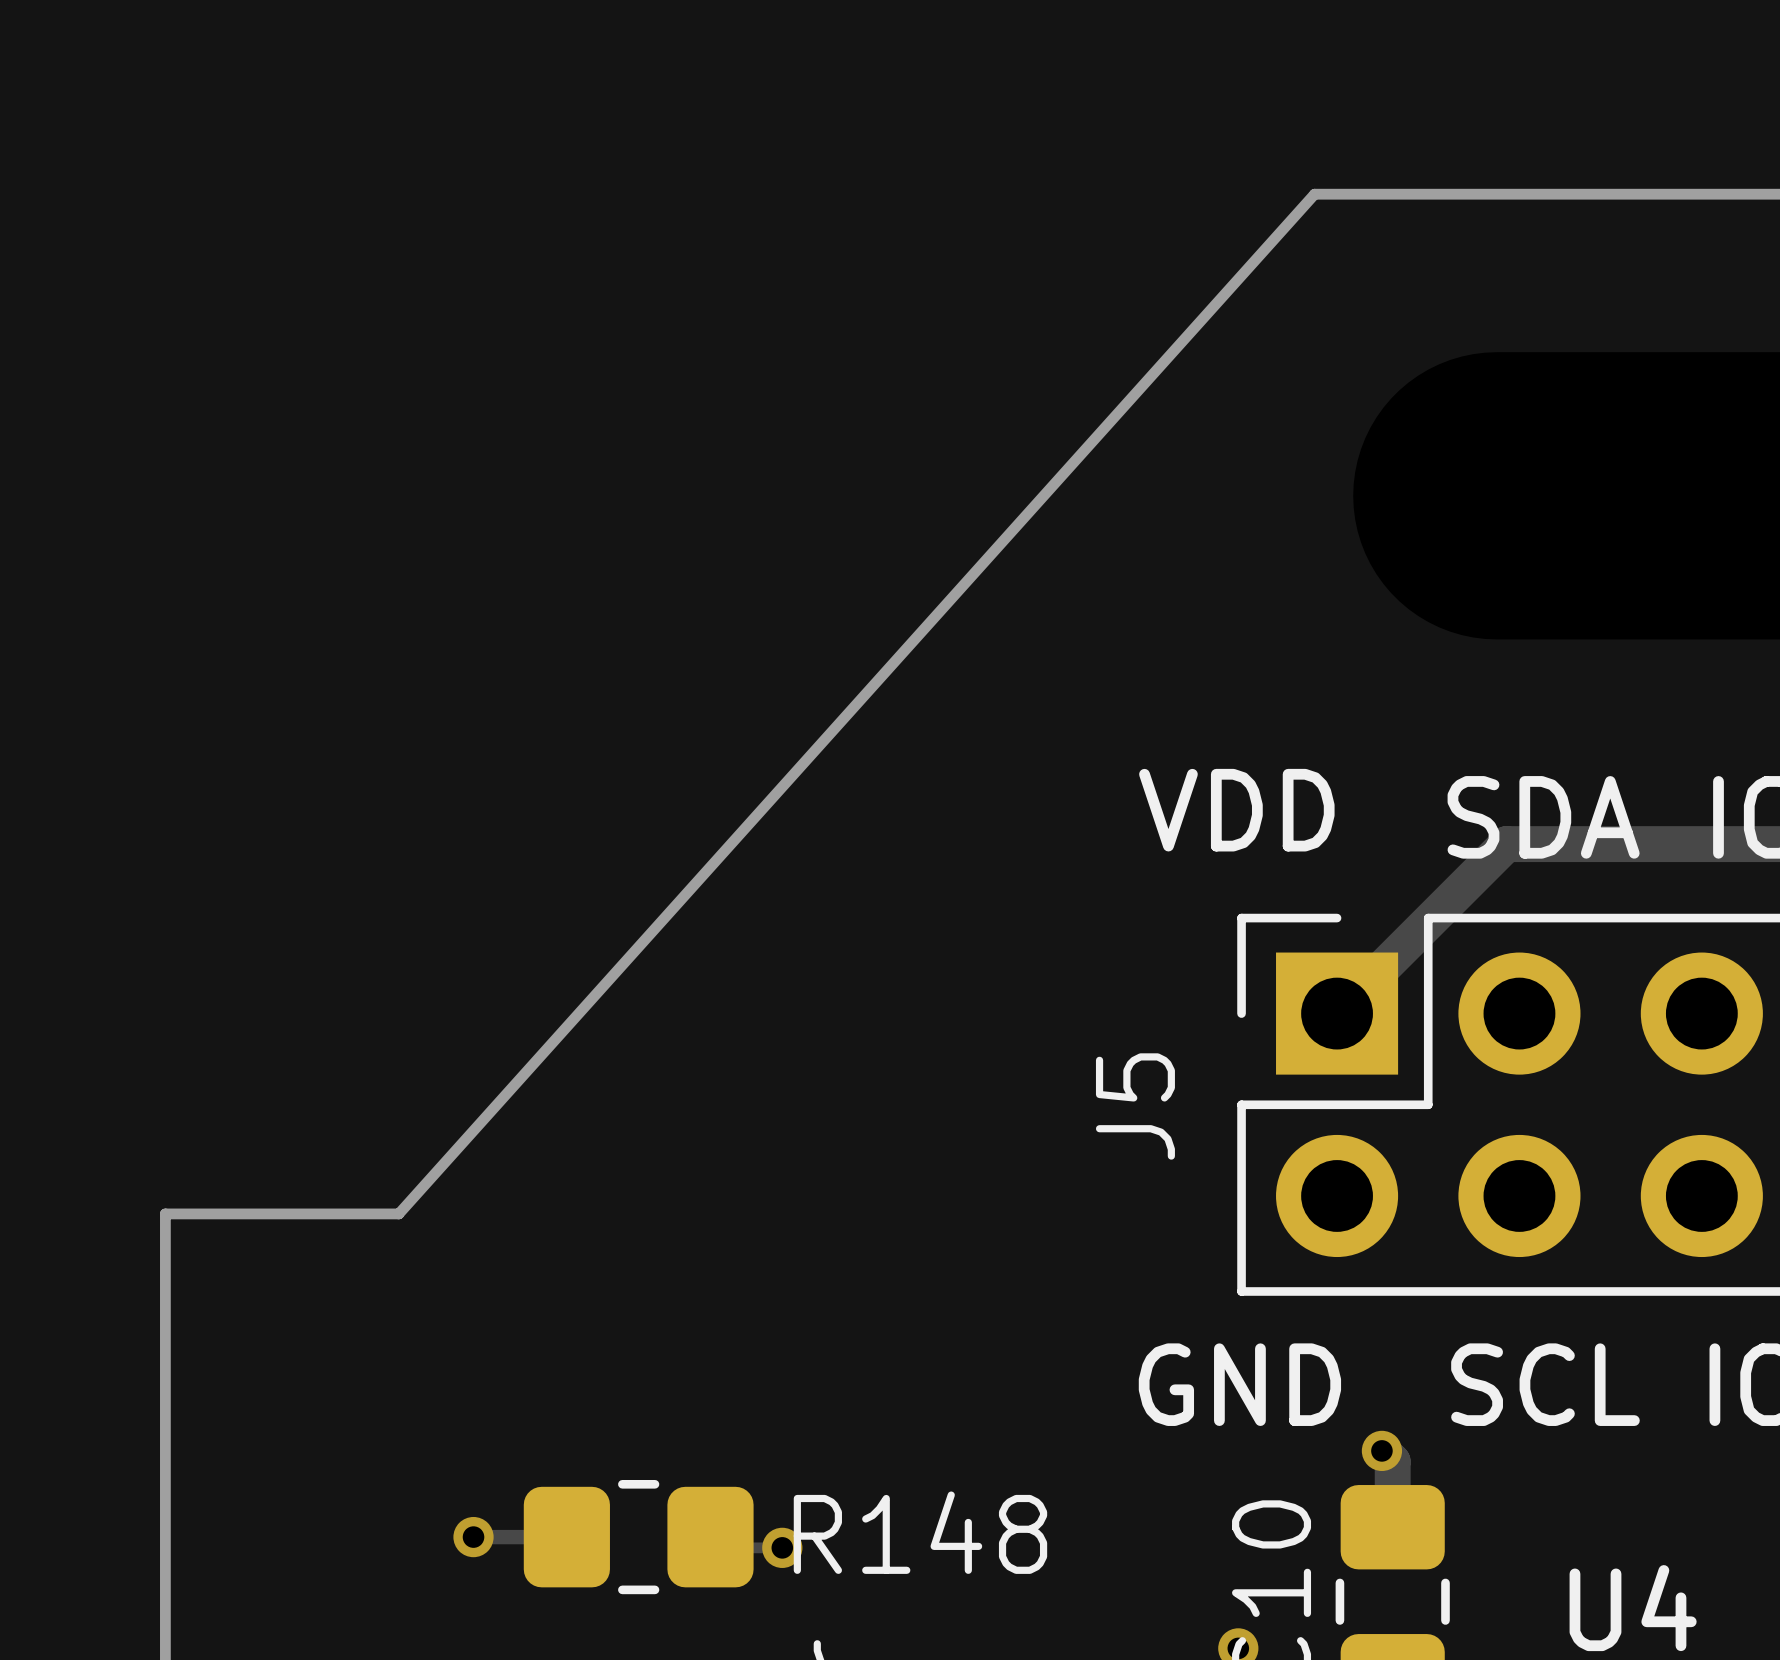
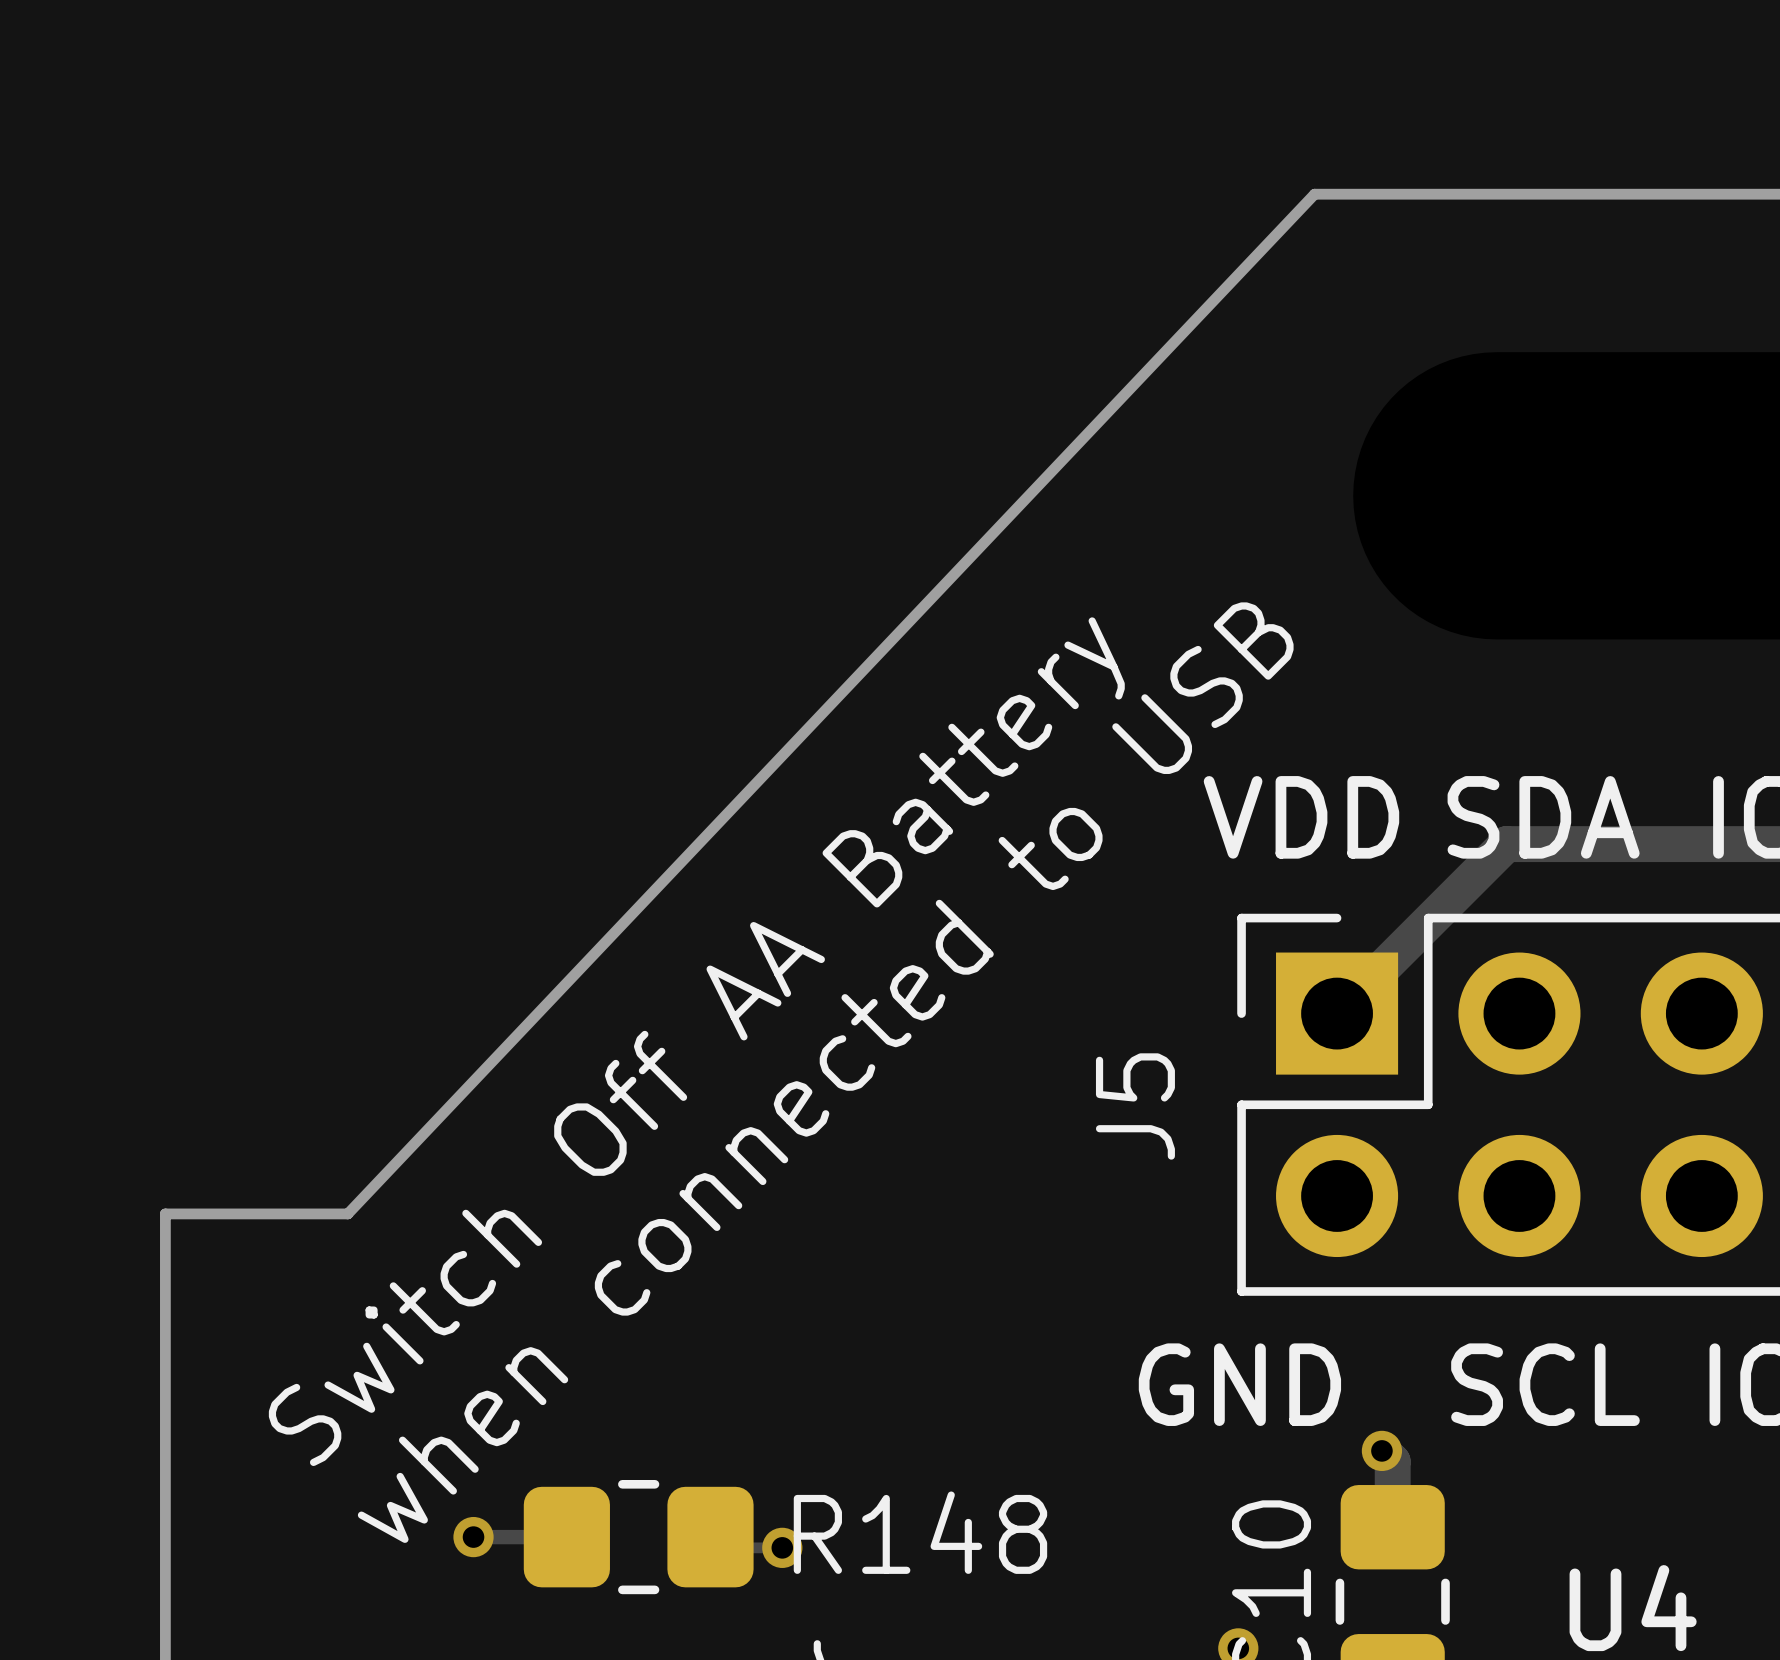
board edge: (1314, 194) (398, 1213) (347, 1213) -> (1314, 194) (347, 1213)
text position: VDD (1236, 810) -> VDD (1301, 817)
text: none -> Switch Off AA Battery (696, 1041)
text: none -> when connected to USB (825, 1072)

